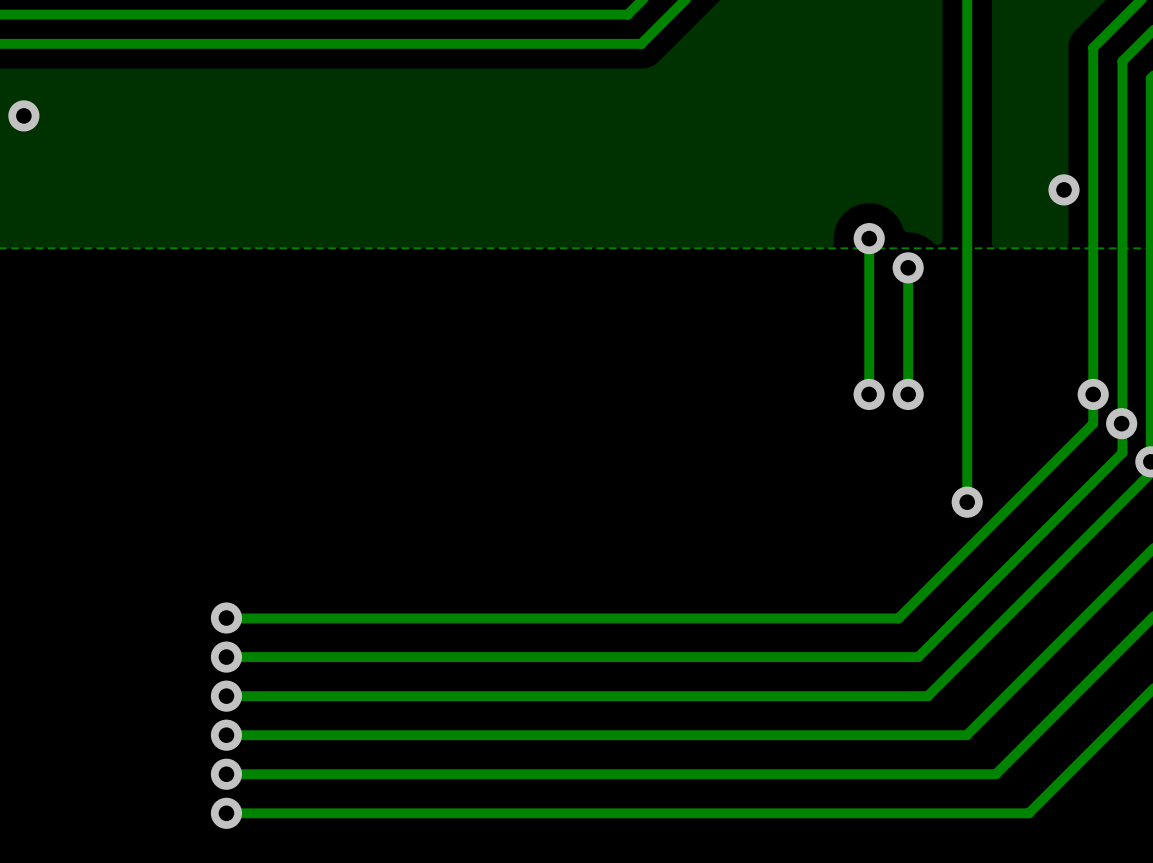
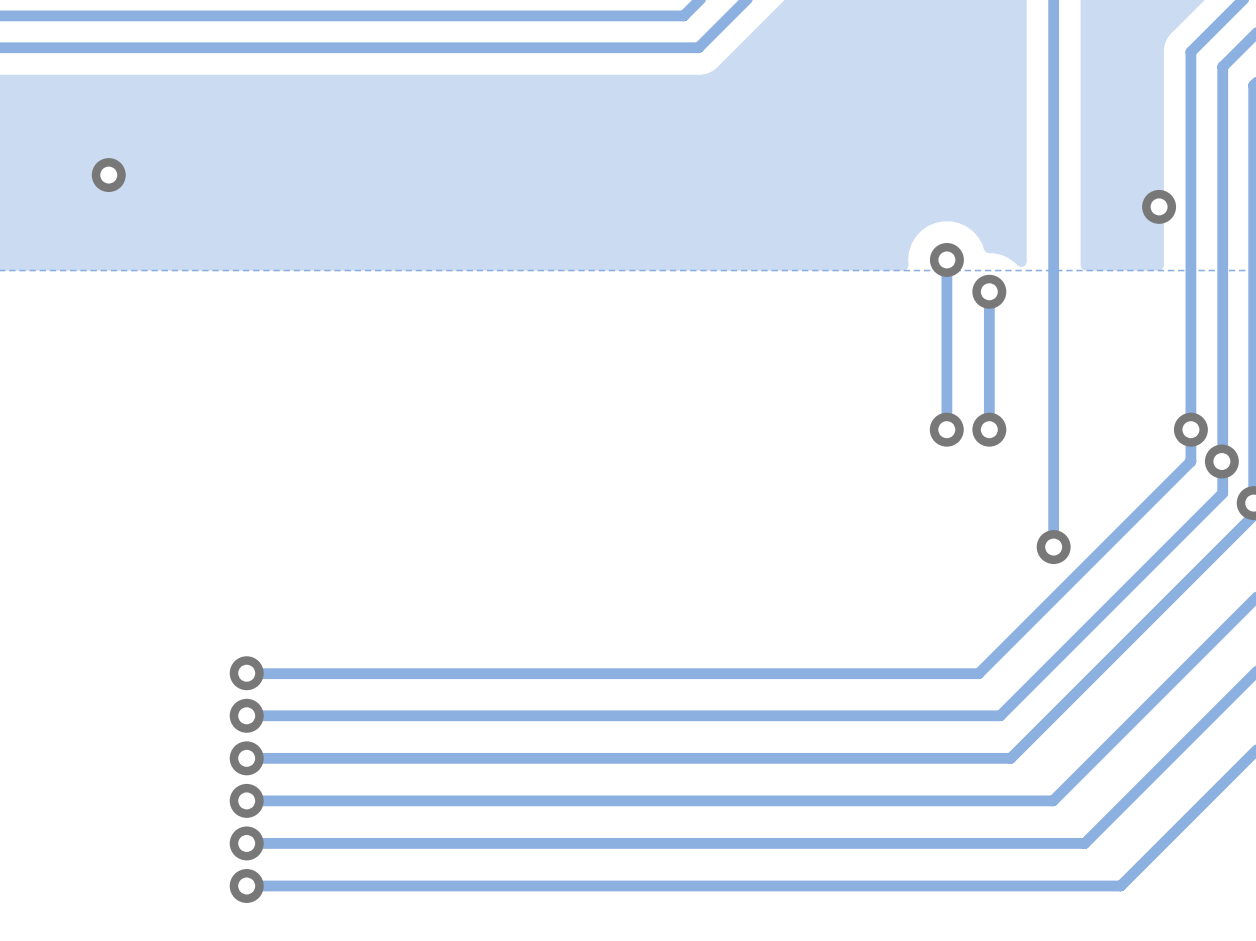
via: (23, 115) -> none
via: none -> (108, 175)

